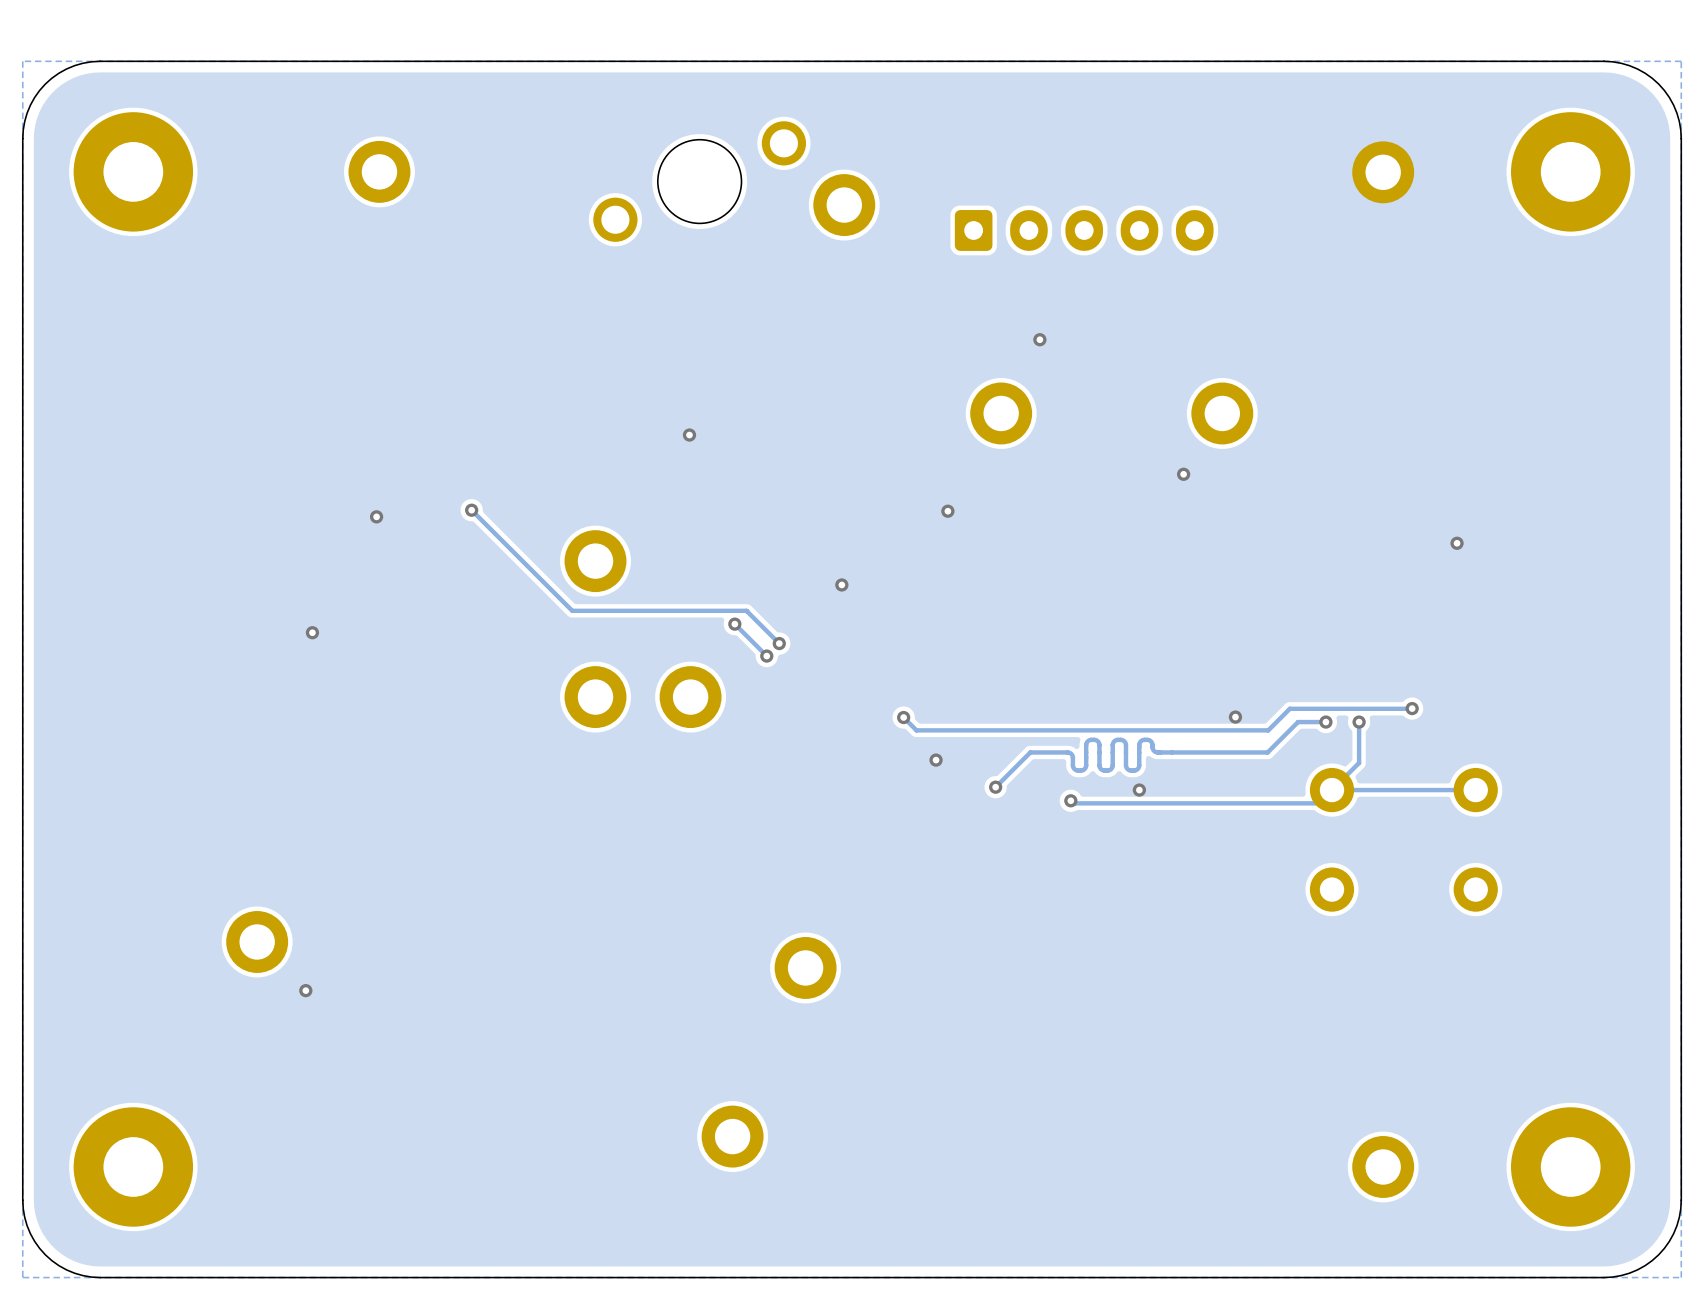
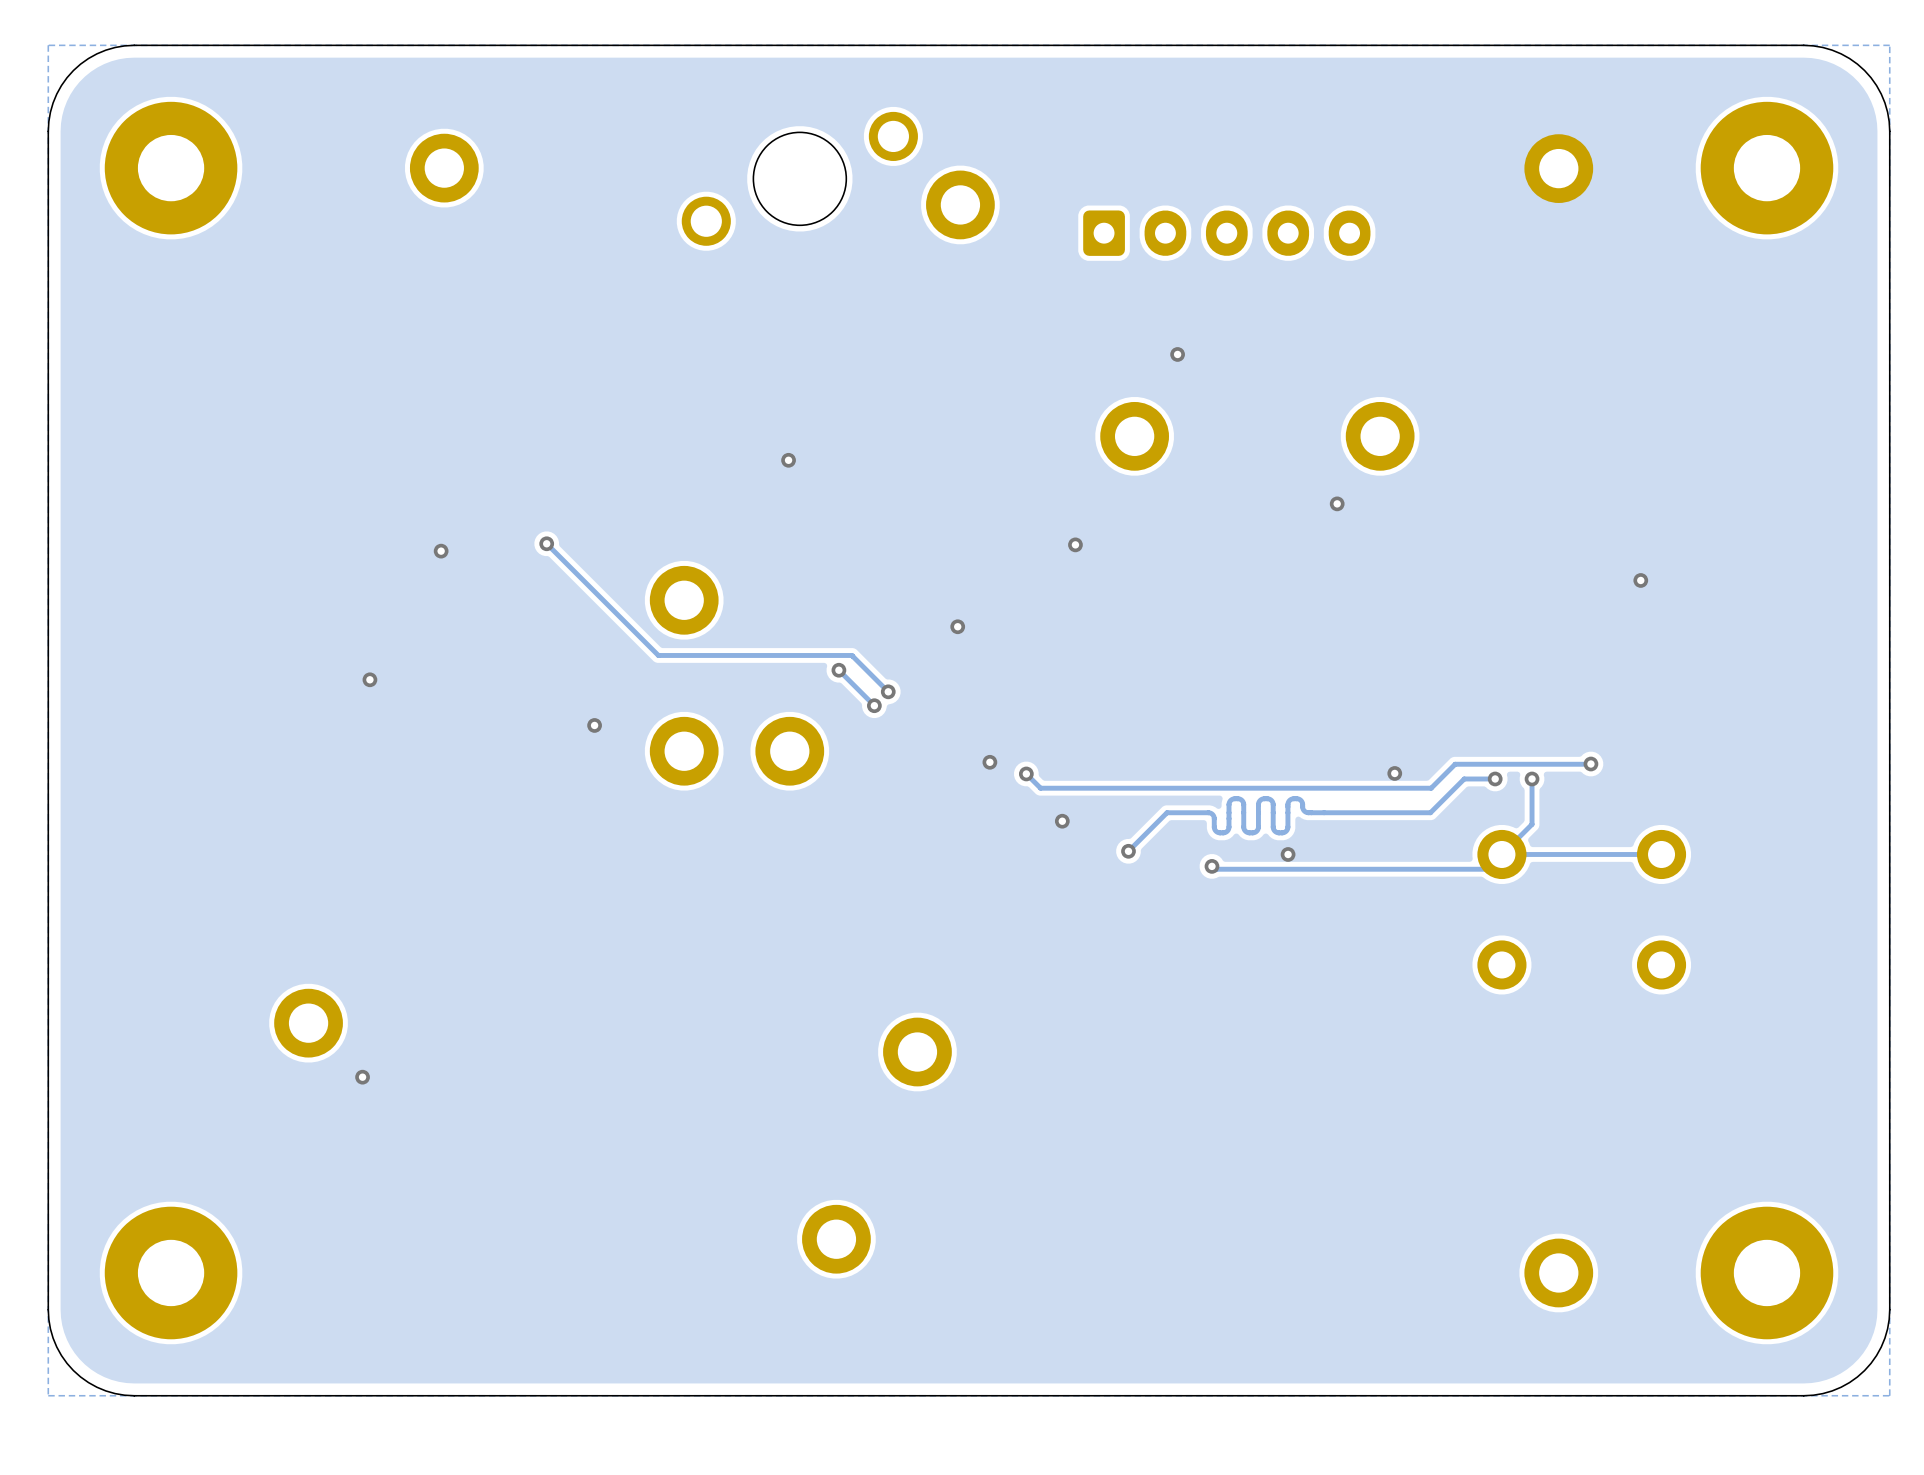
via: none -> (594, 725)
via: none -> (989, 762)

